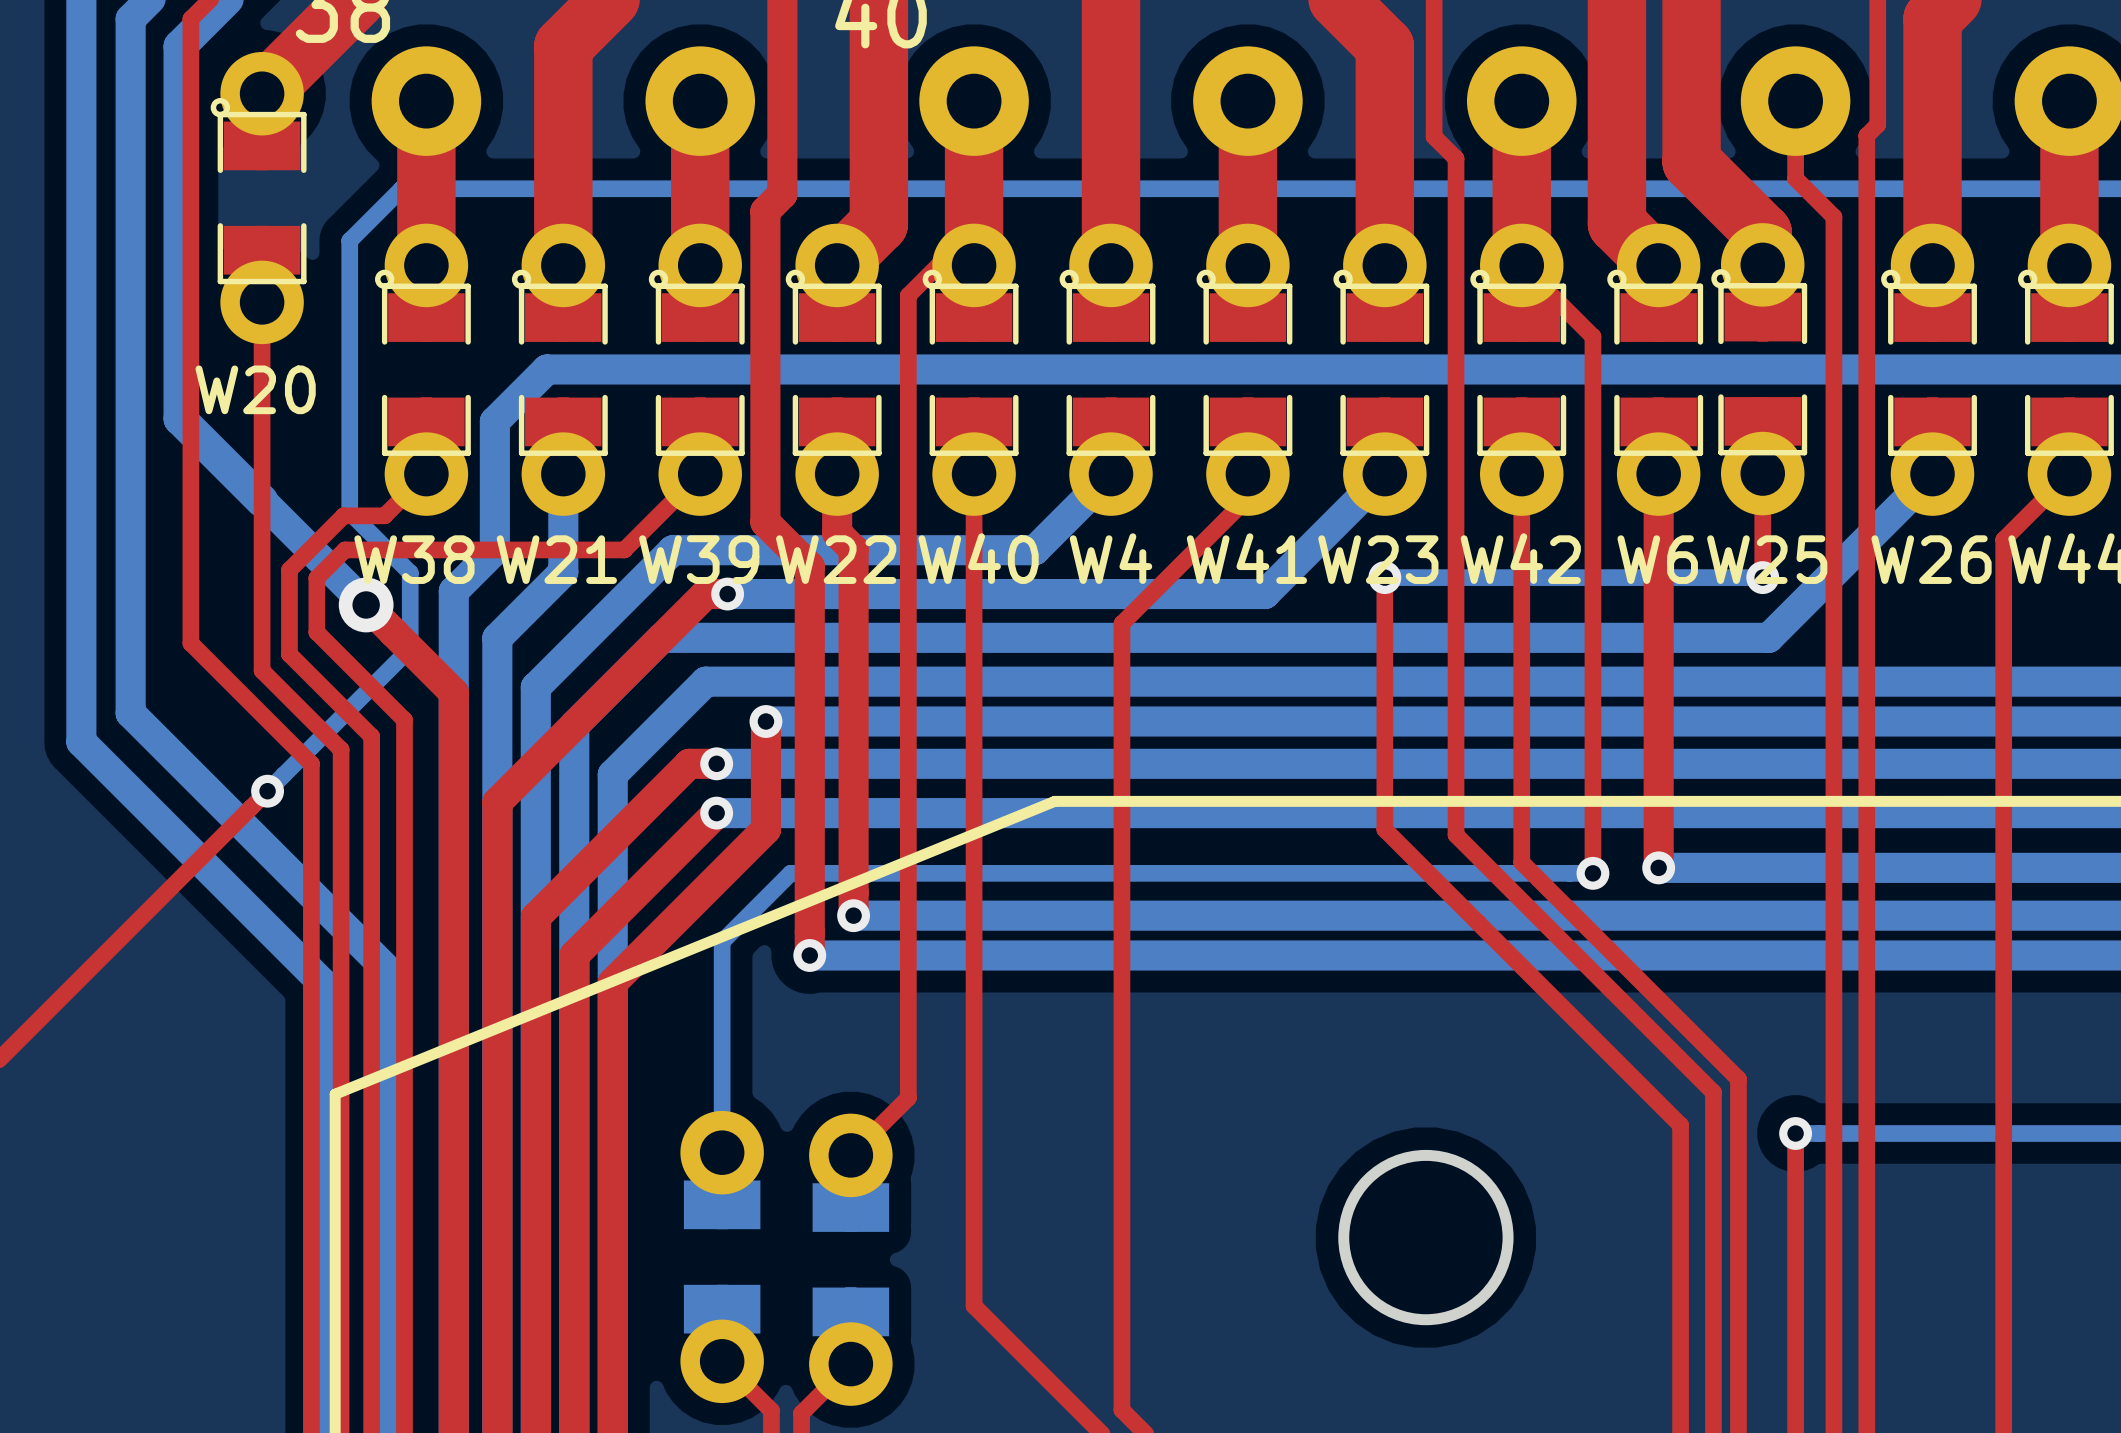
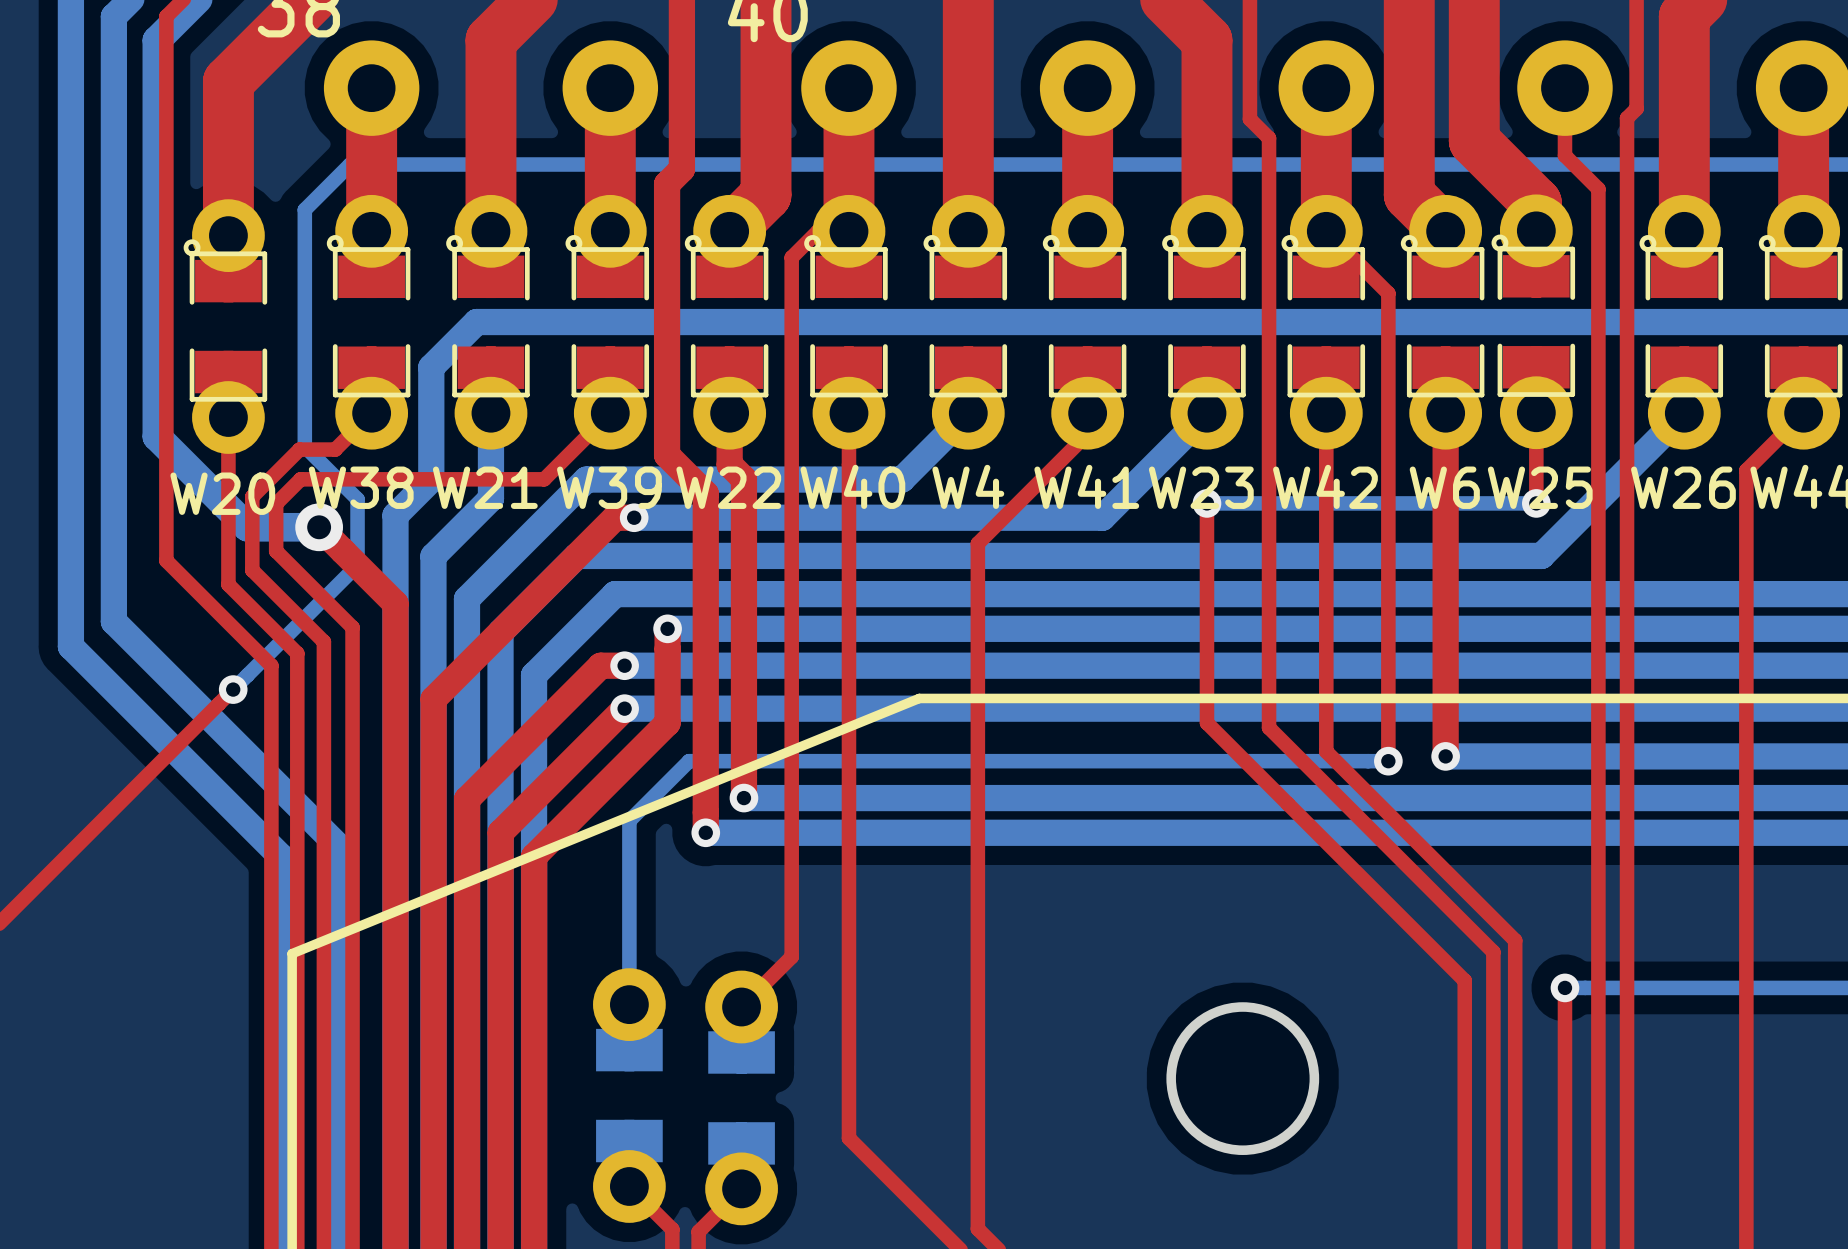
top track: none -> (228, 81) (228, 223)
W20 position: (258, 198) -> (225, 326)
top track: (262, 302) (262, 479) -> none
bottom track: (179, 418) (366, 604) -> (156, 364) (156, 436) (247, 527) (319, 527)

